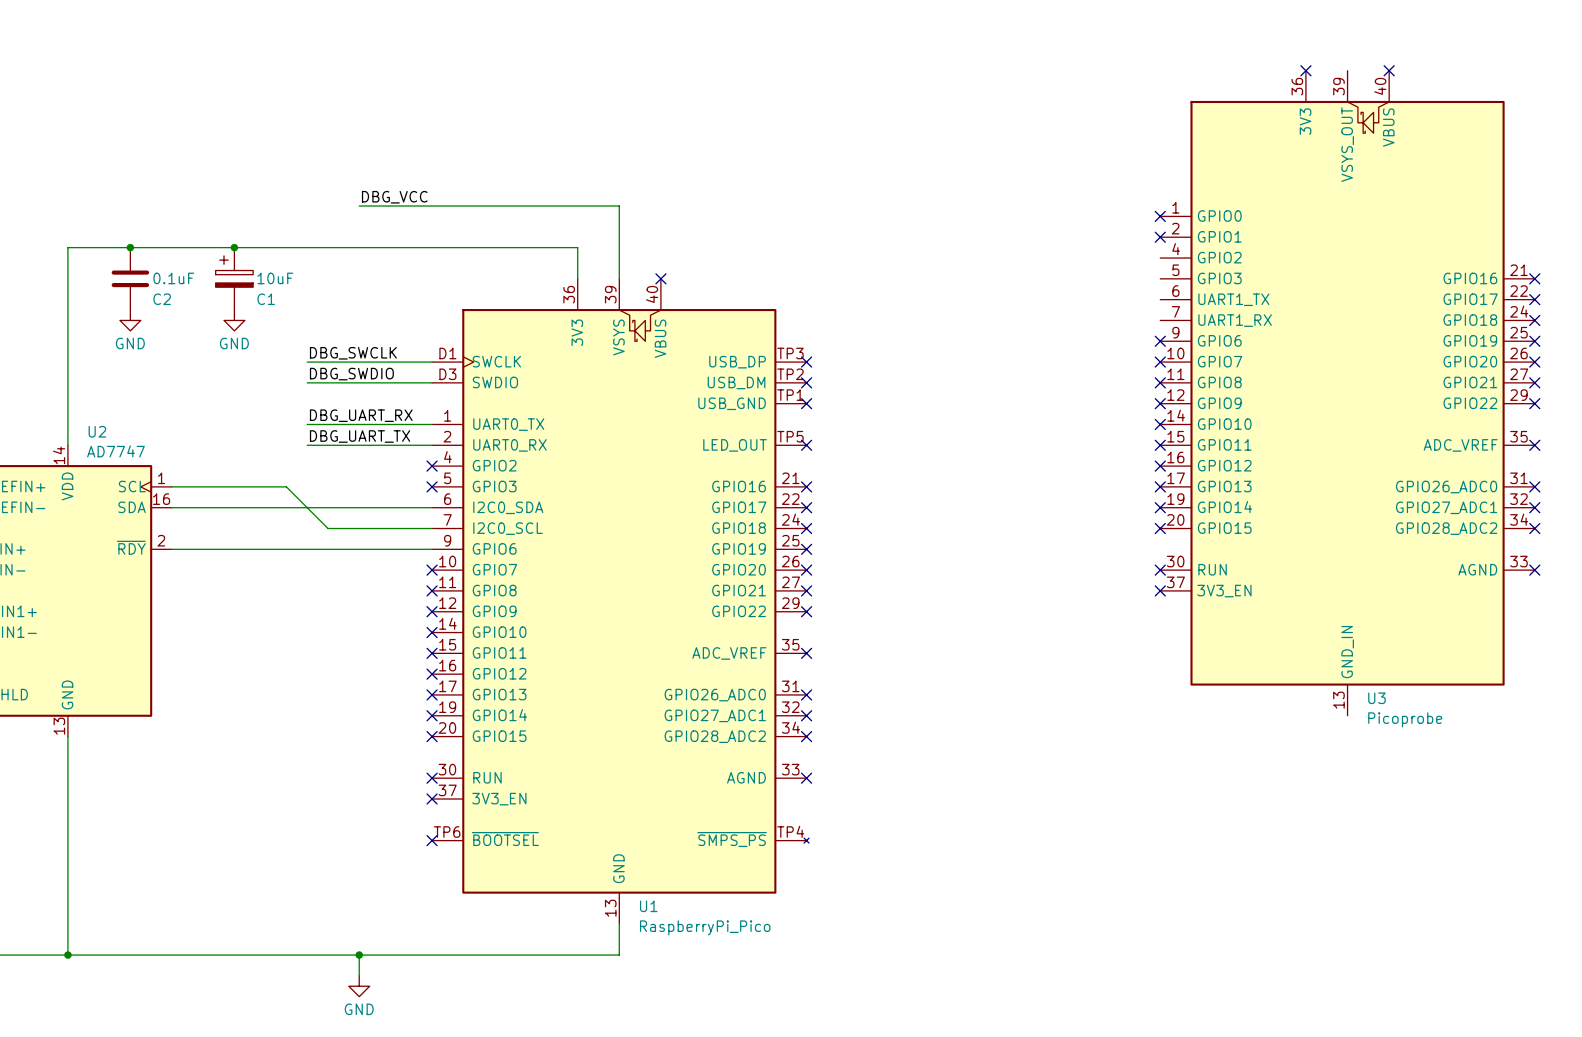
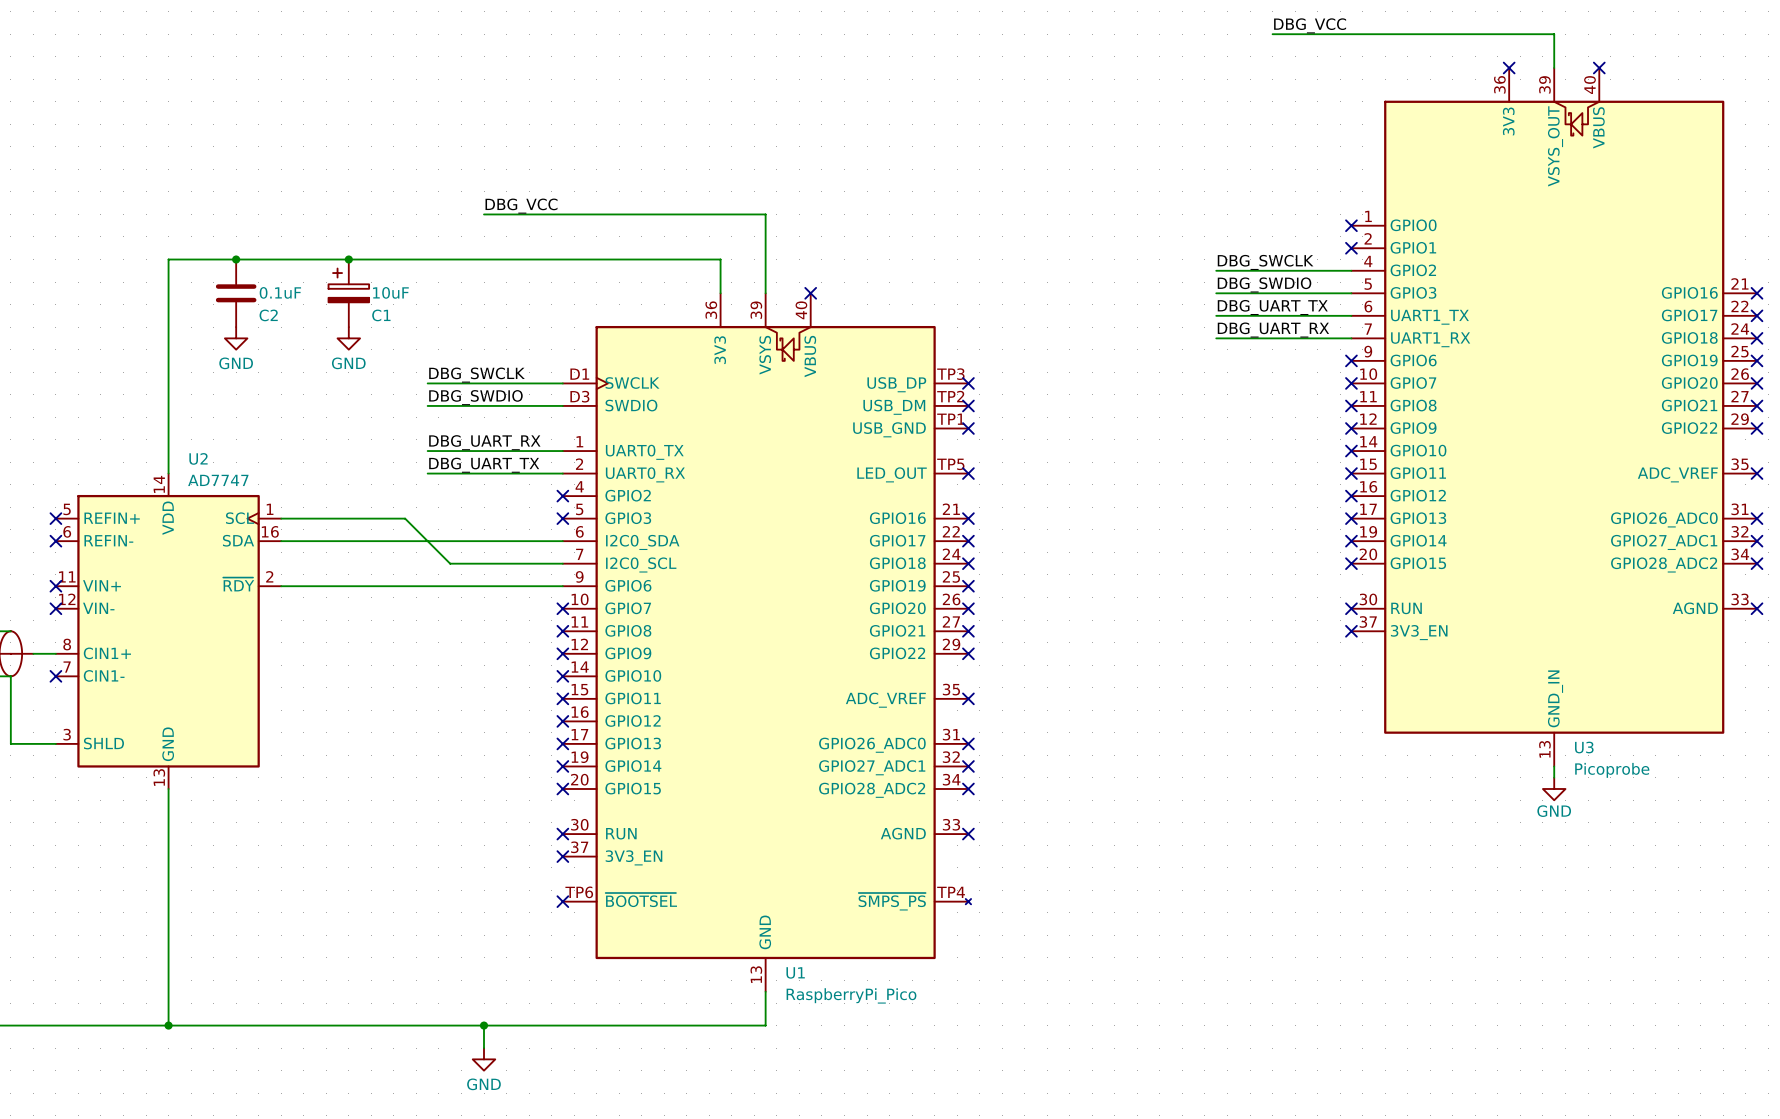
label: none -> DBG_VCC (1310, 25)
wire: none -> (1272, 34) (1554, 34) (1554, 68)
label: none -> DBG_SWCLK (1265, 262)
wire: none -> (1216, 270) (1351, 270)
label: none -> DBG_SWDIO (1264, 284)
wire: none -> (1216, 293) (1351, 293)
label: none -> DBG_UART_TX (1272, 307)
wire: none -> (1216, 315) (1351, 315)
label: none -> DBG_UART_RX (1273, 330)
wire: none -> (1216, 338) (1351, 338)
wire: none -> (1554, 766) (1554, 777)
power symbol: none -> GND (1554, 788)

